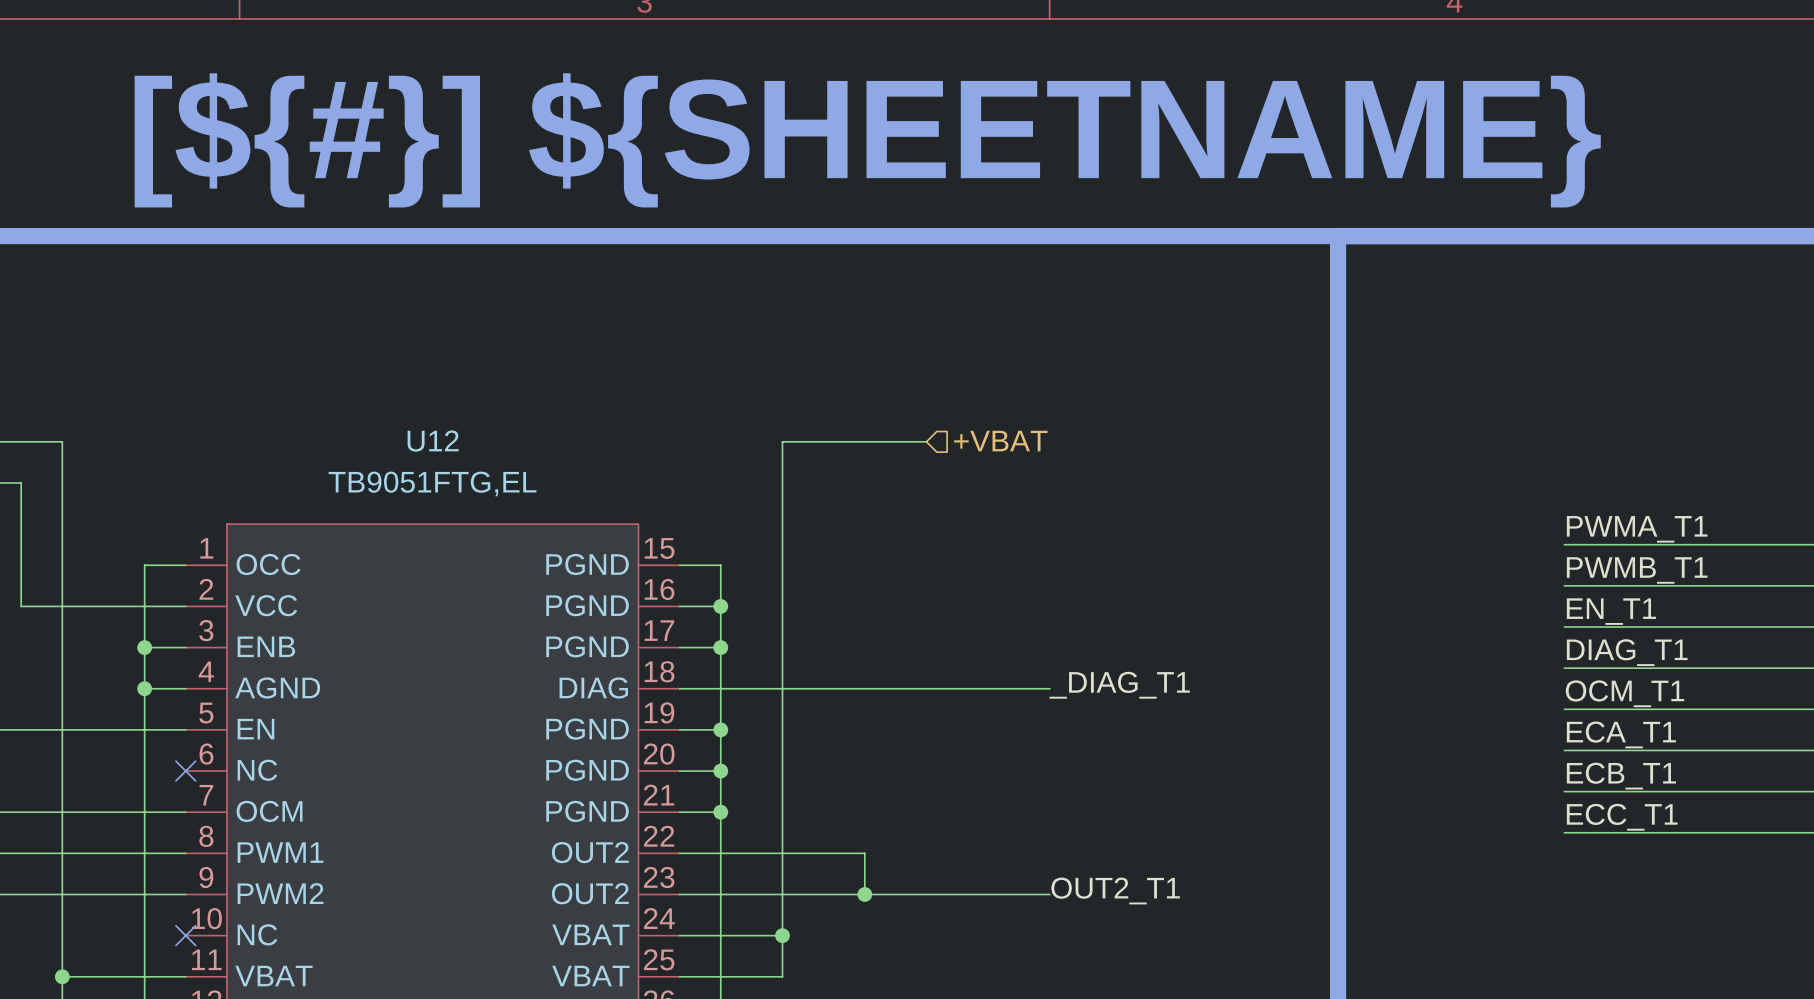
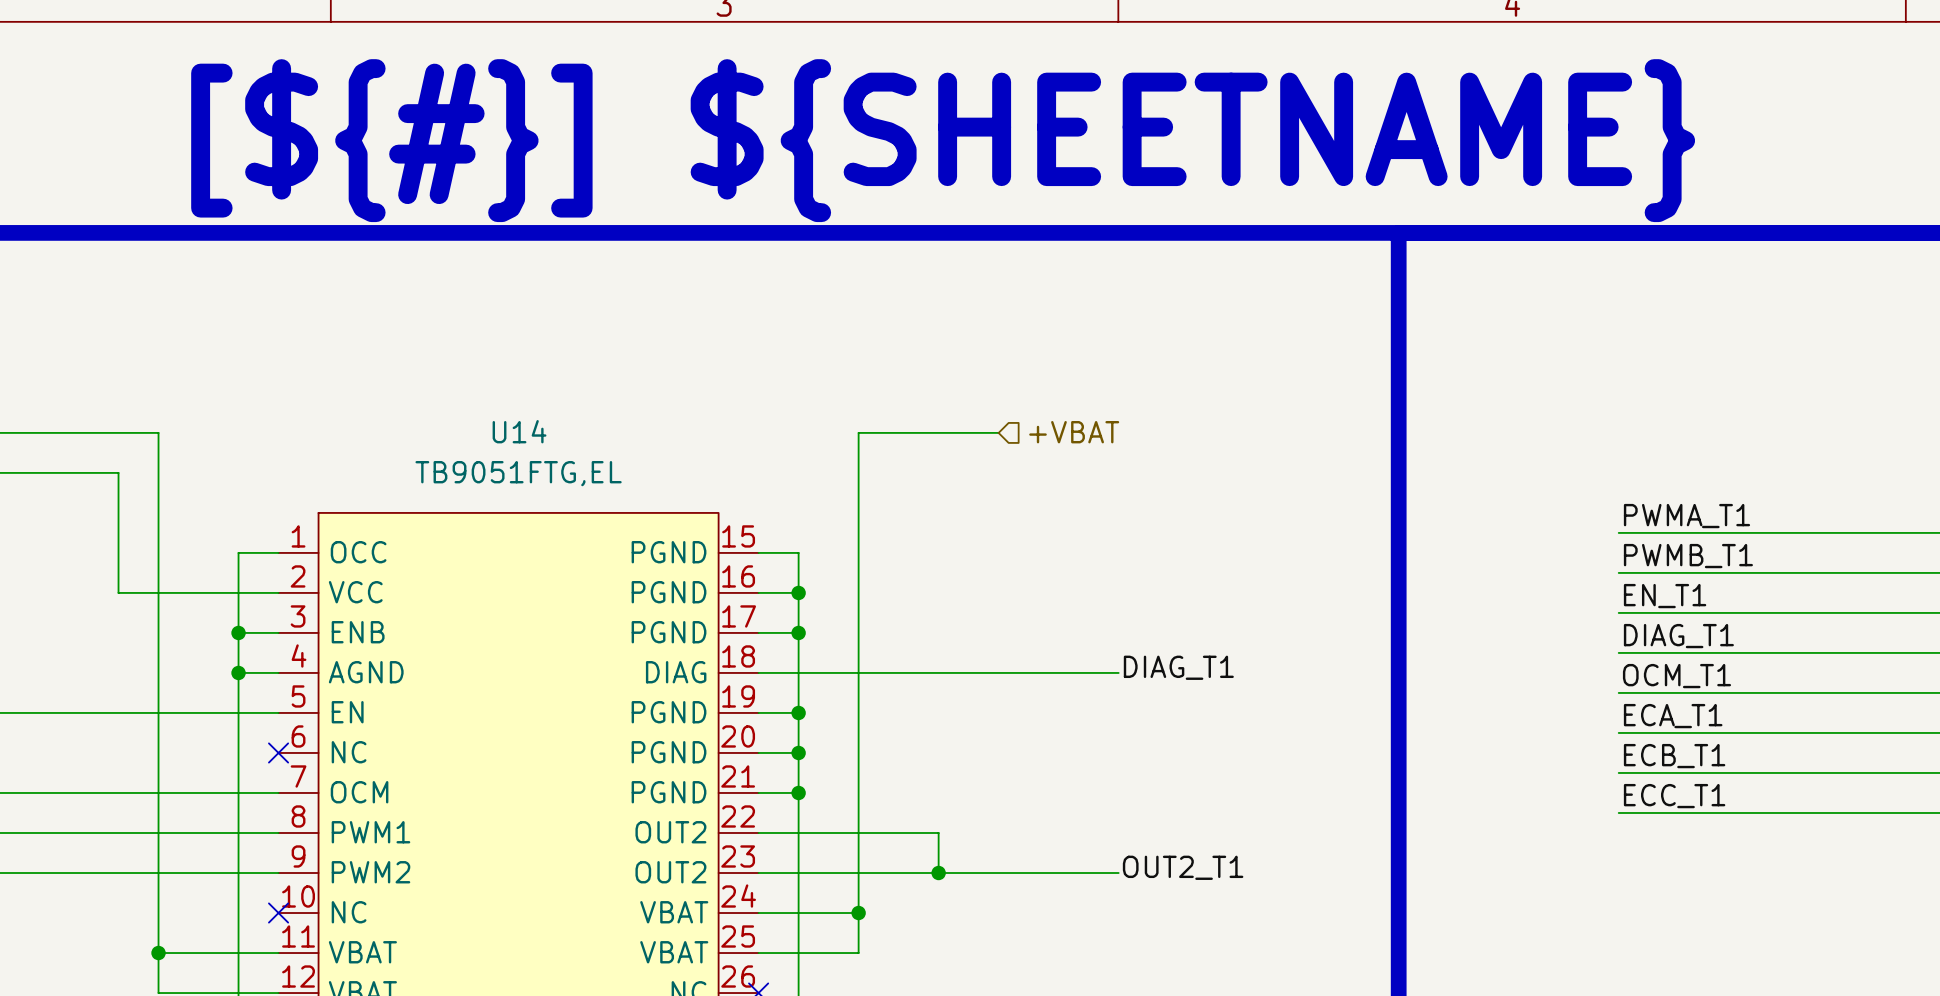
U12 name: U12 (433, 441) -> U14 (519, 431)
label: _DIAG_T1 (1119, 685) -> DIAG_T1 (1178, 667)

